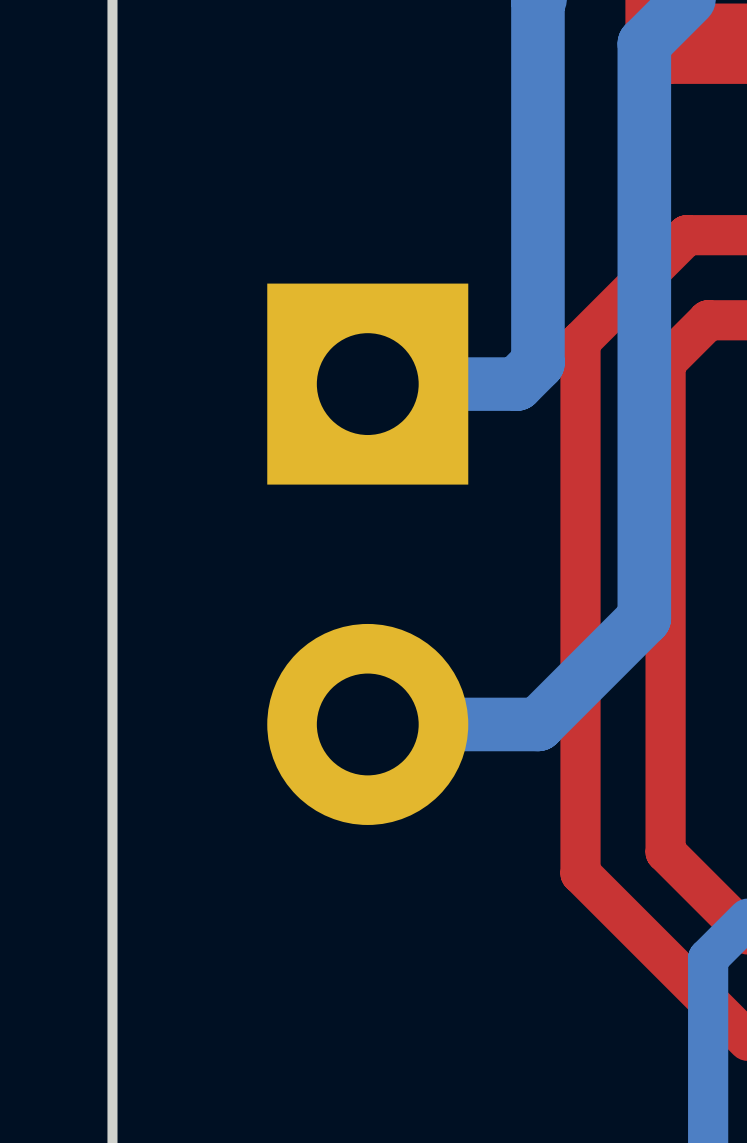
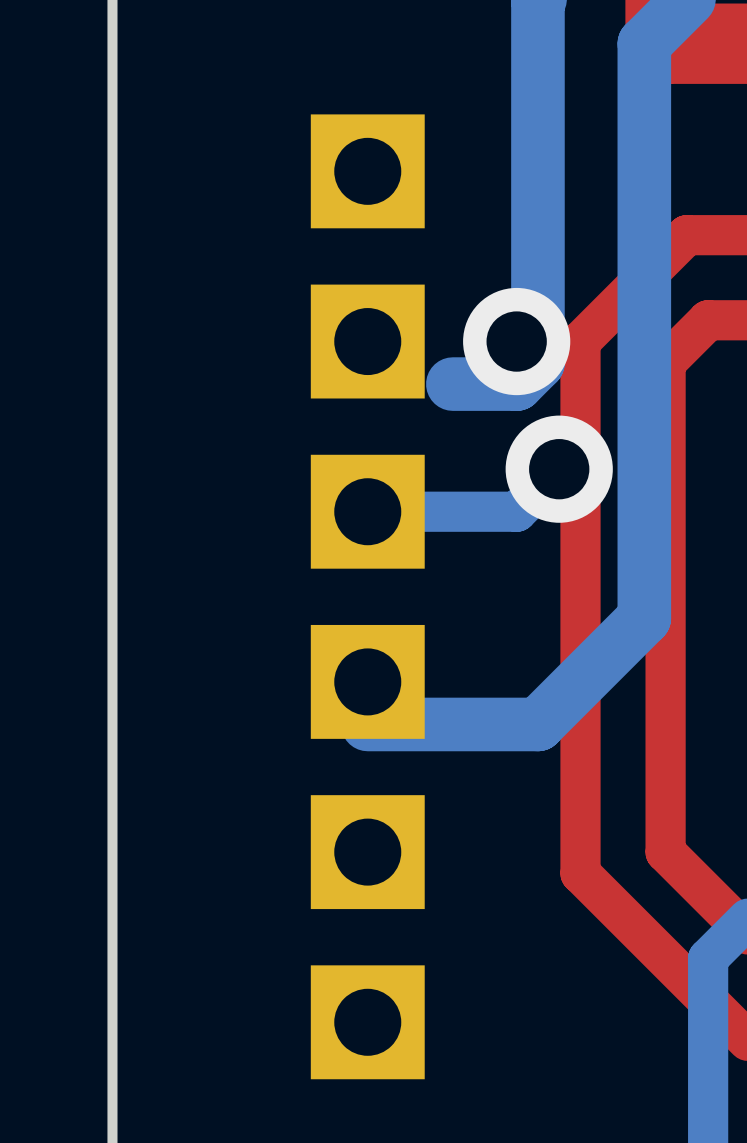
part: none -> (367, 171)
part footprint: [267, 283, 469, 825] -> [310, 454, 425, 569]
part: none -> (367, 341)
via: none -> (516, 341)
bottom track: none -> (559, 469) (516, 511) (367, 511)
via: none -> (559, 469)
part: none -> (367, 681)
part: none -> (367, 852)
part: none -> (367, 1022)

